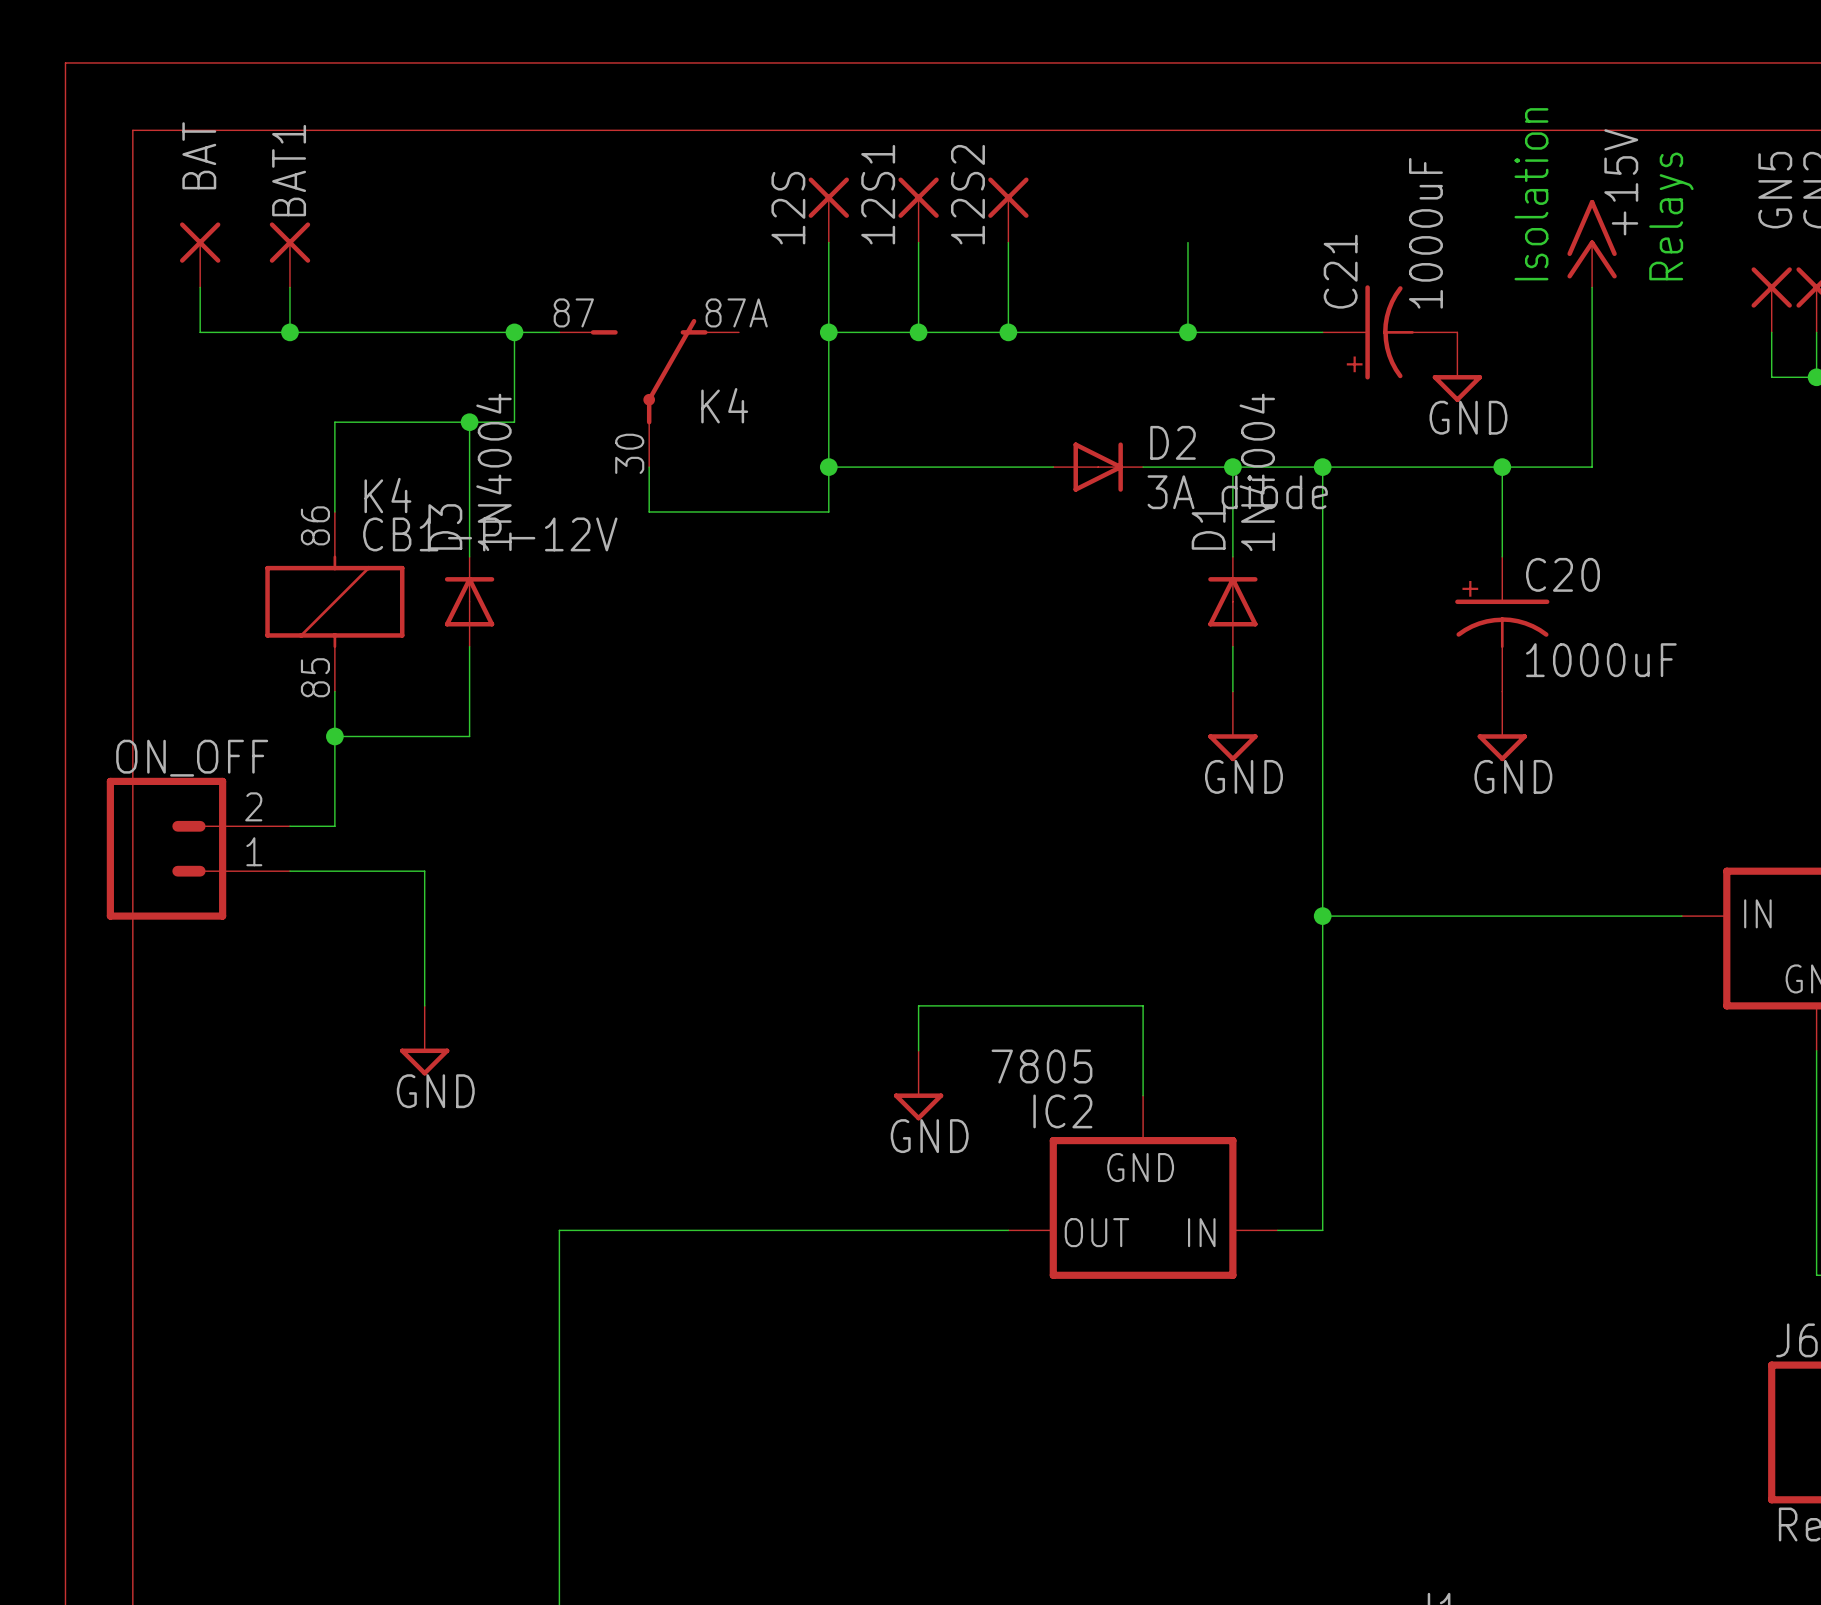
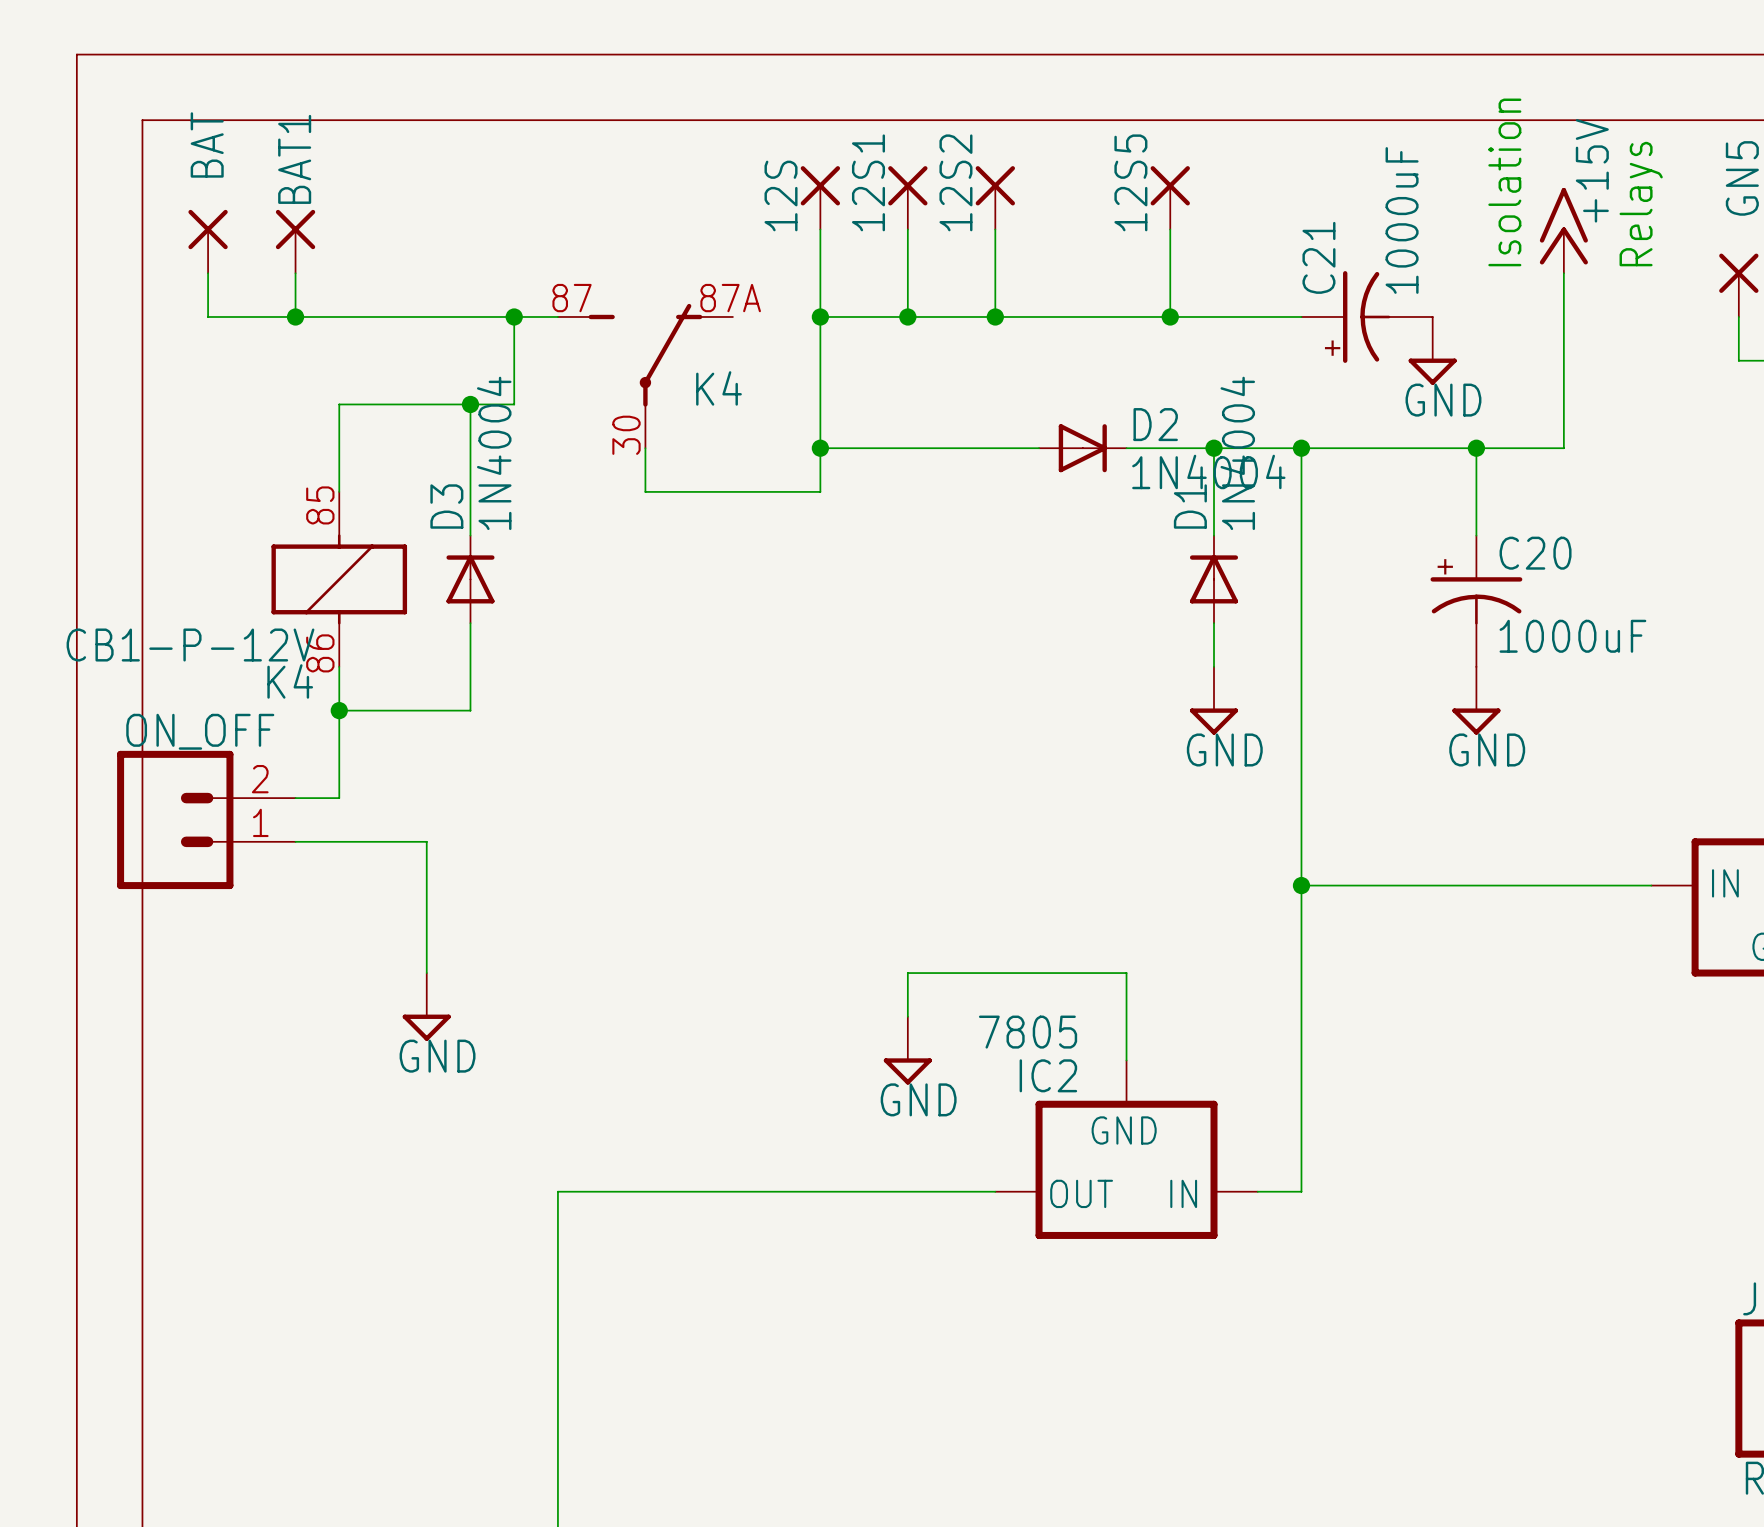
12S5: none -> (1170, 197)
D2 value: 3A diode (1237, 492) -> 1N4004 (1208, 471)
K4 rotation: 0° (334, 601) -> 180° (339, 579)

